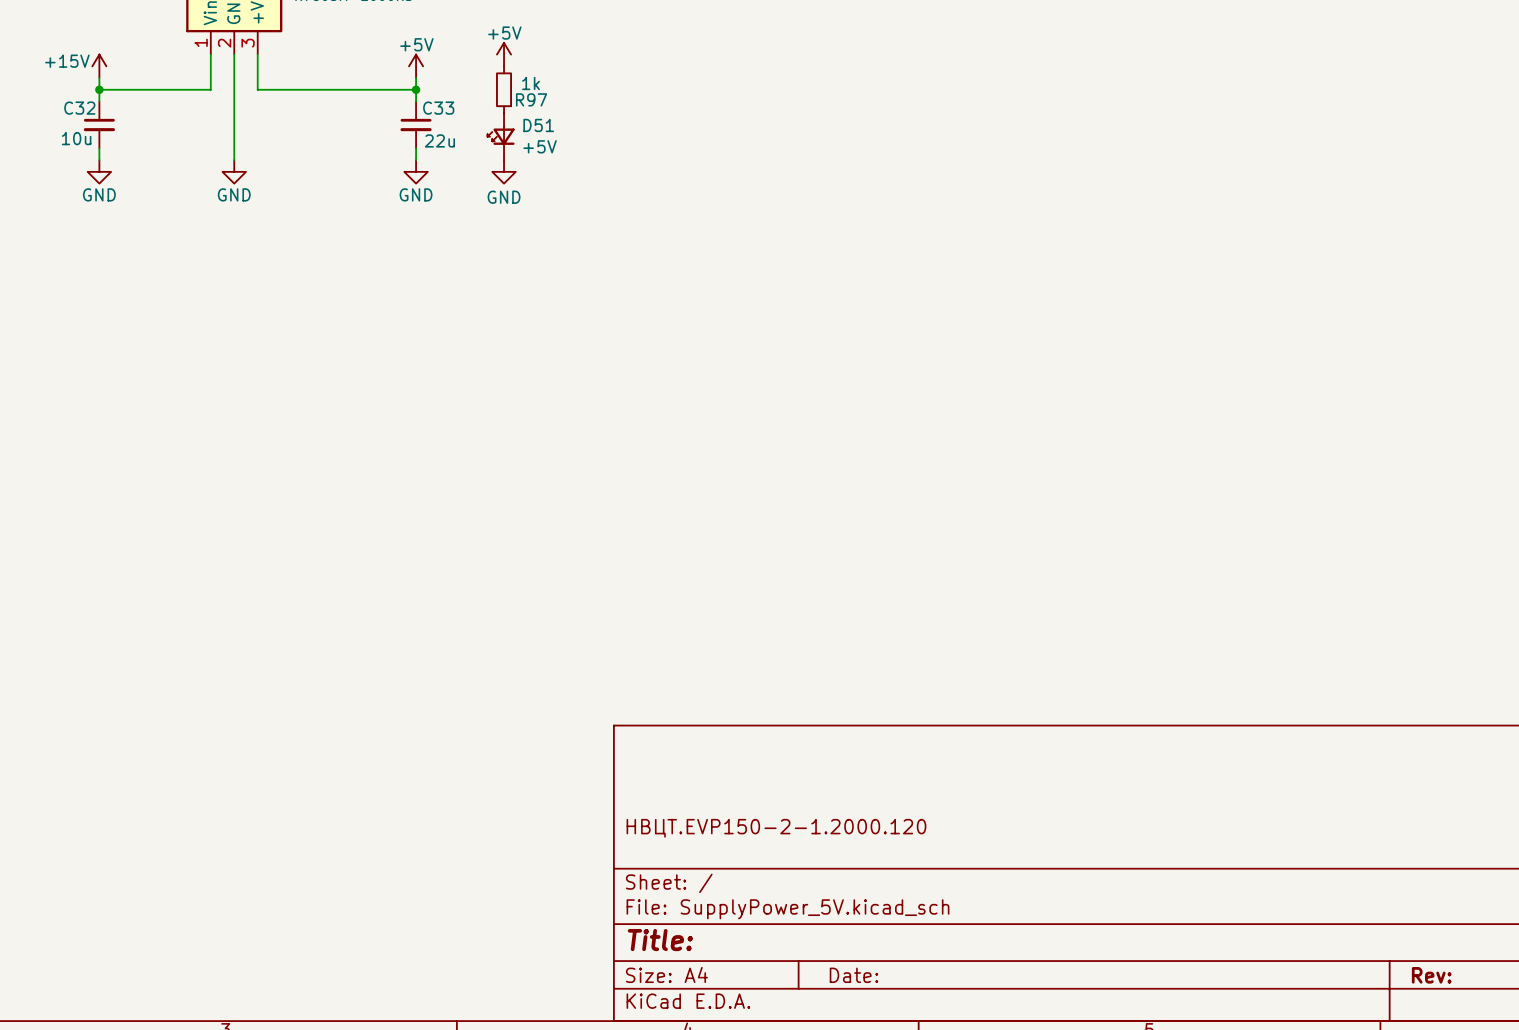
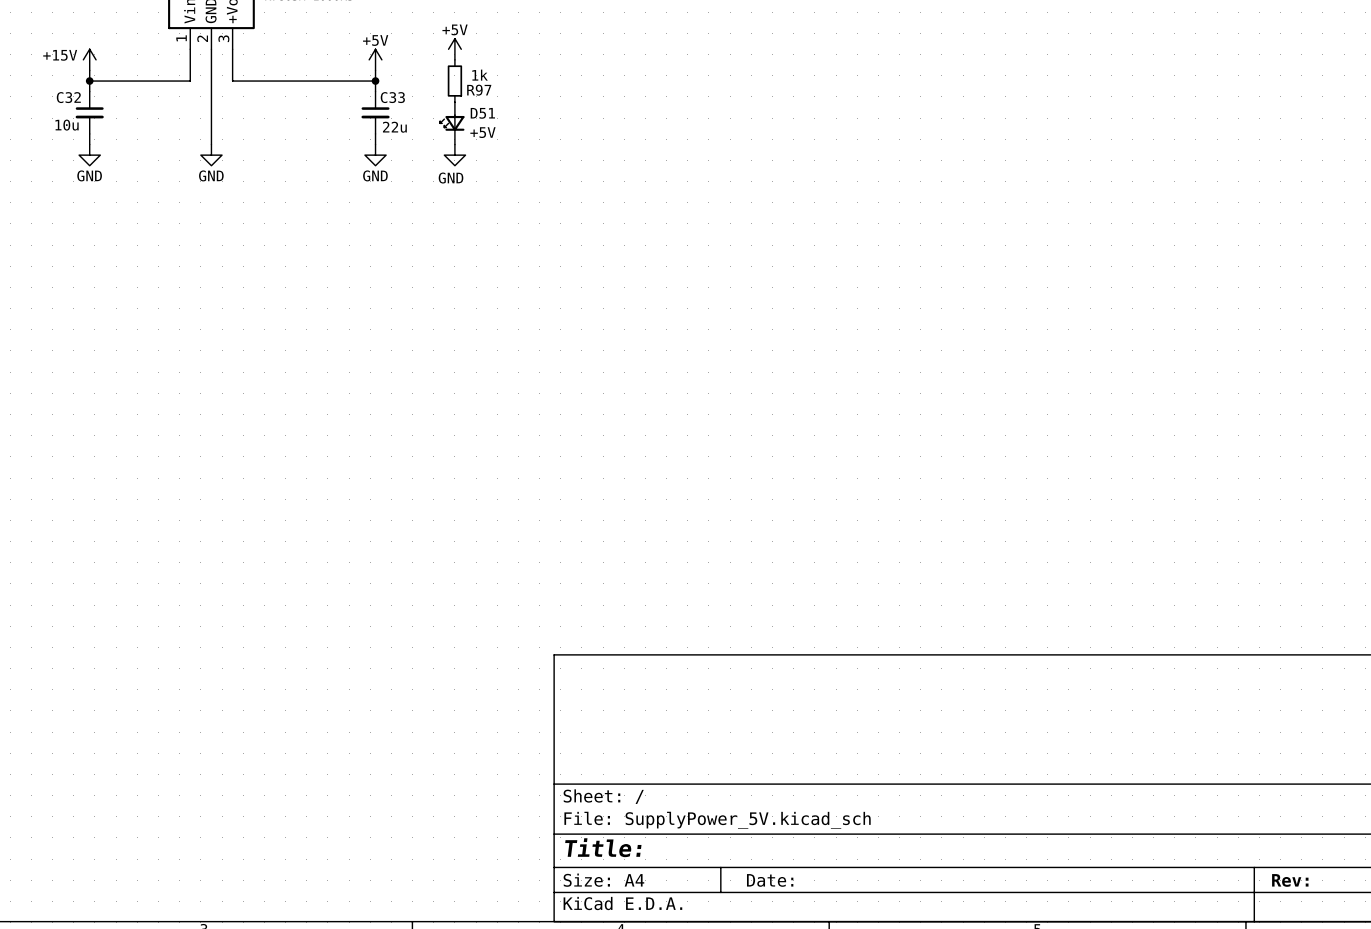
title block: НВЦТ.EVP150-2-1.2000.120 (776, 828) -> none

